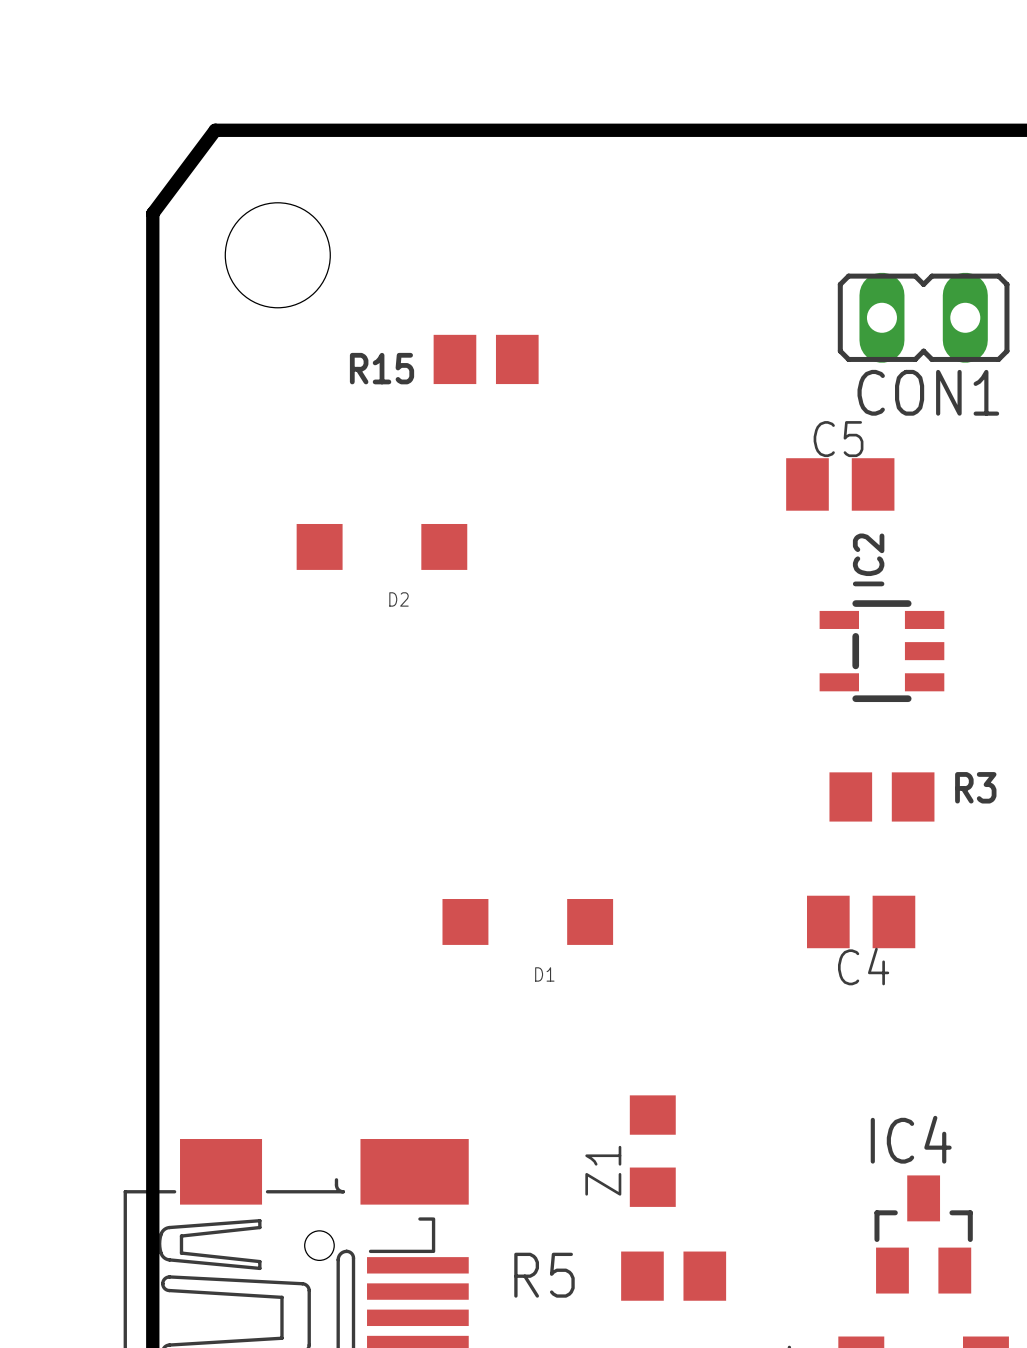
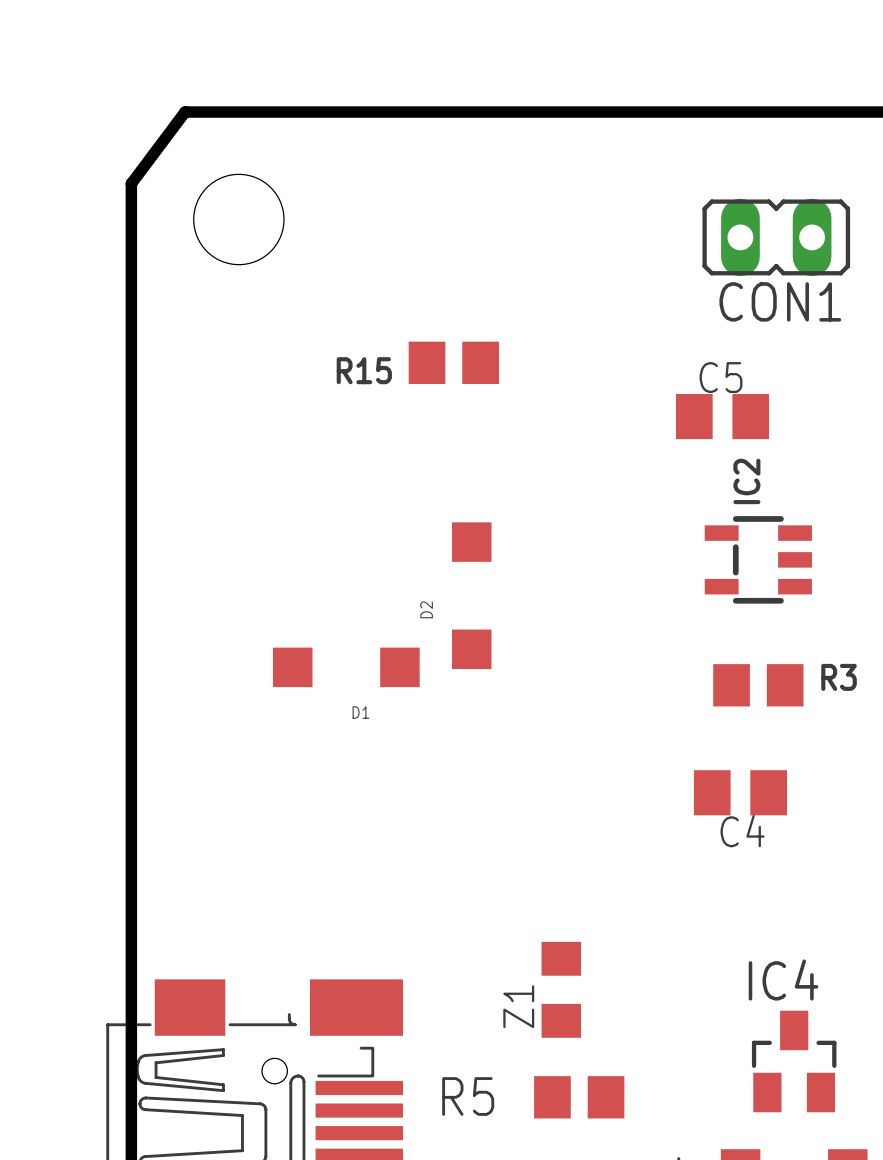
CON1 position: (923, 317) -> (776, 237)
R15 position: (486, 359) -> (453, 362)
D2 rotation: 0° (381, 546) -> 90° clockwise (471, 595)
D2 position: (381, 546) -> (471, 595)
D1 position: (527, 921) -> (346, 667)

